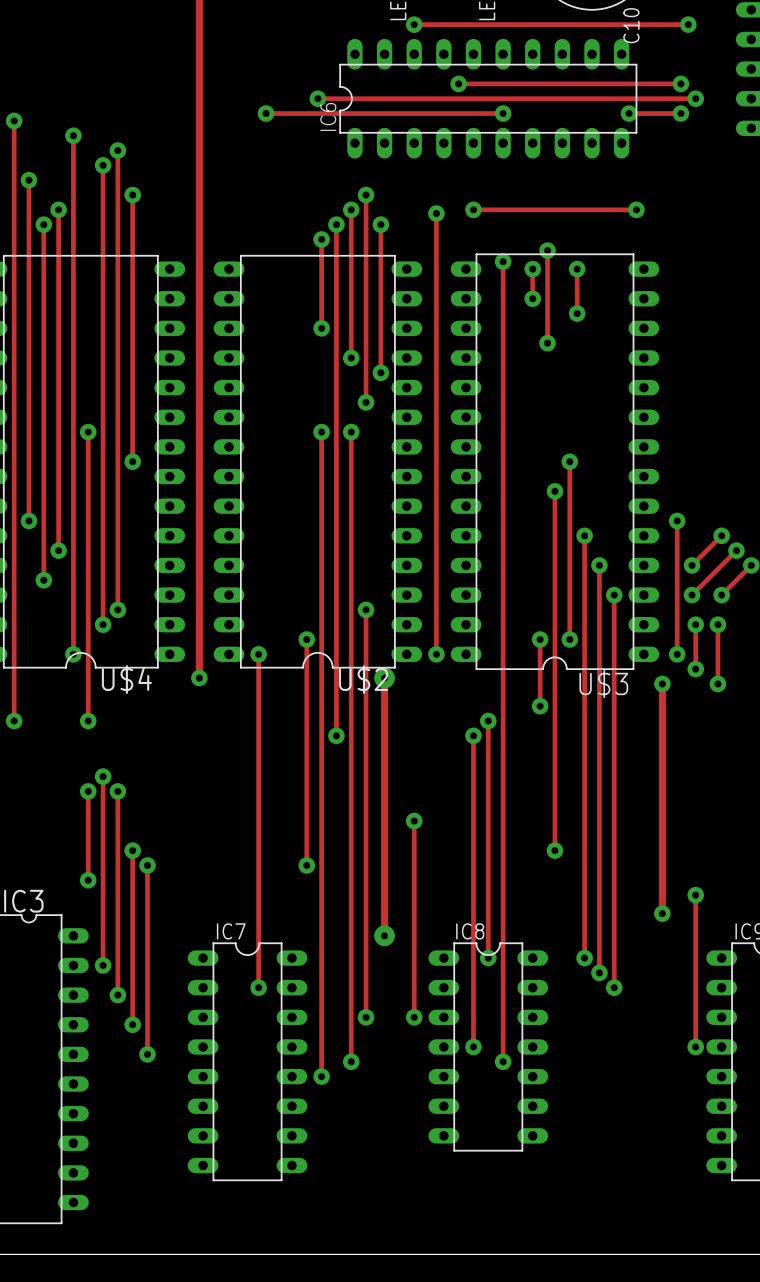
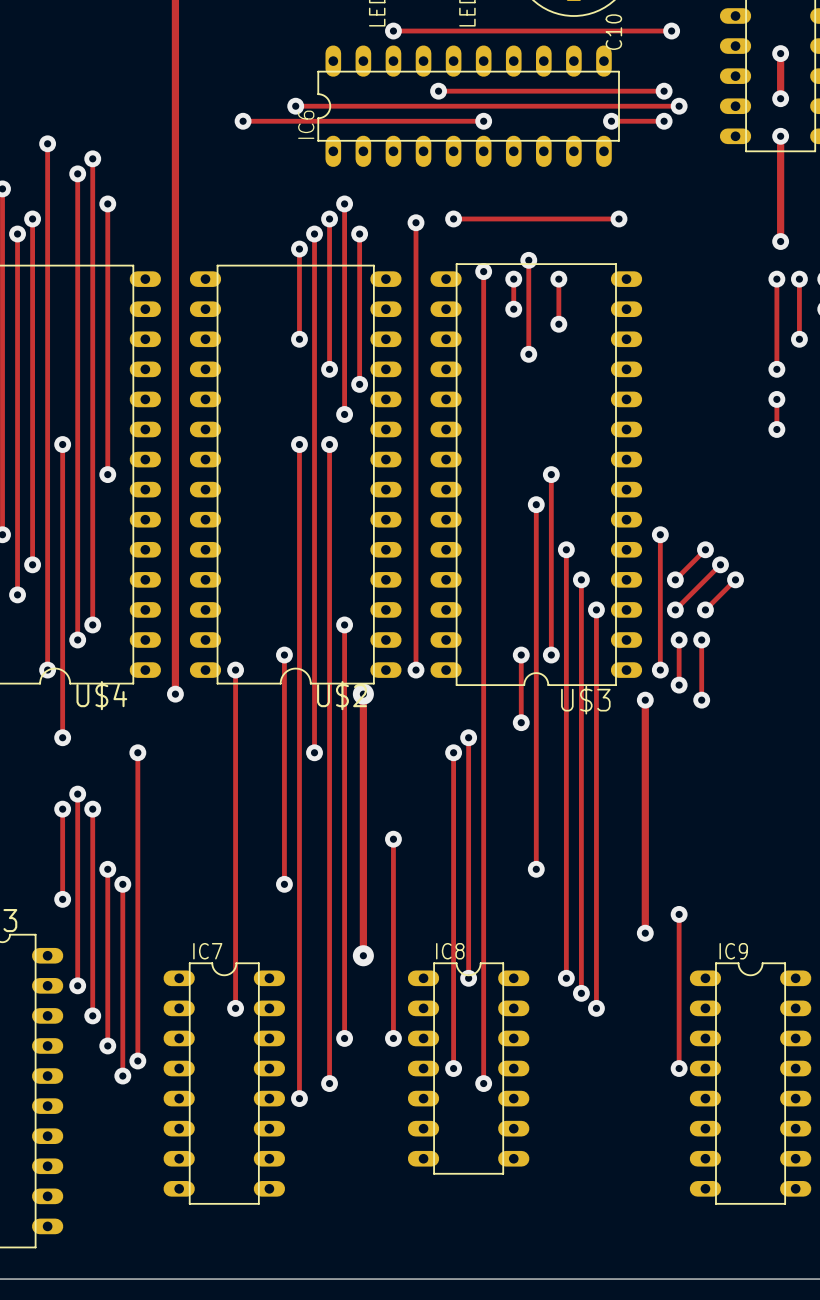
track: none -> (137, 752) (137, 1061)
via: none -> (137, 752)
via: none -> (137, 1061)

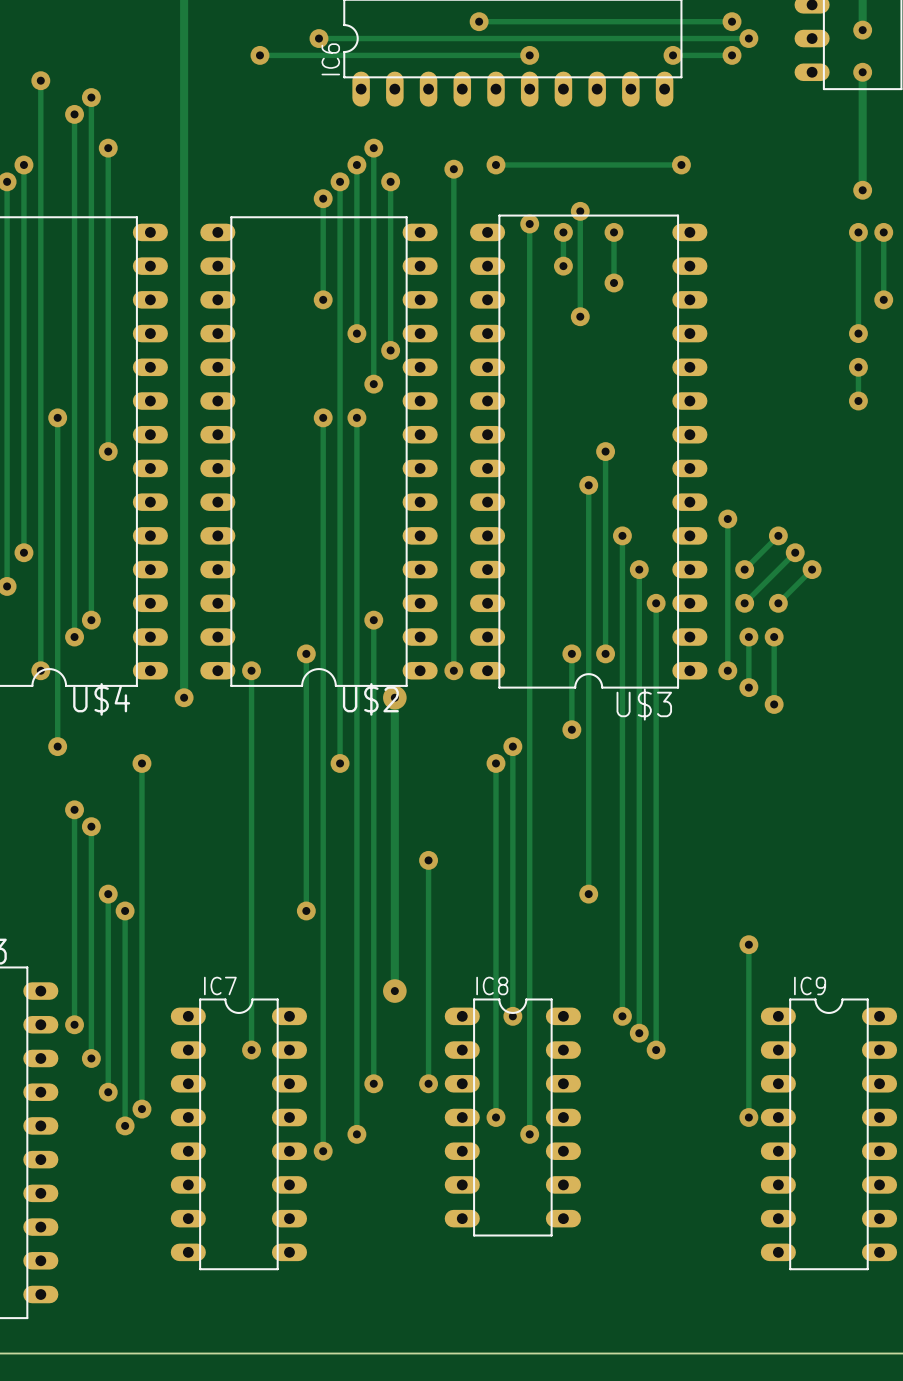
track: (645, 700) (645, 933) -> none
via: (645, 700) -> none
track: (62, 809) (62, 899) -> none
via: (62, 809) -> none
via: (62, 899) -> none
via: (645, 933) -> none

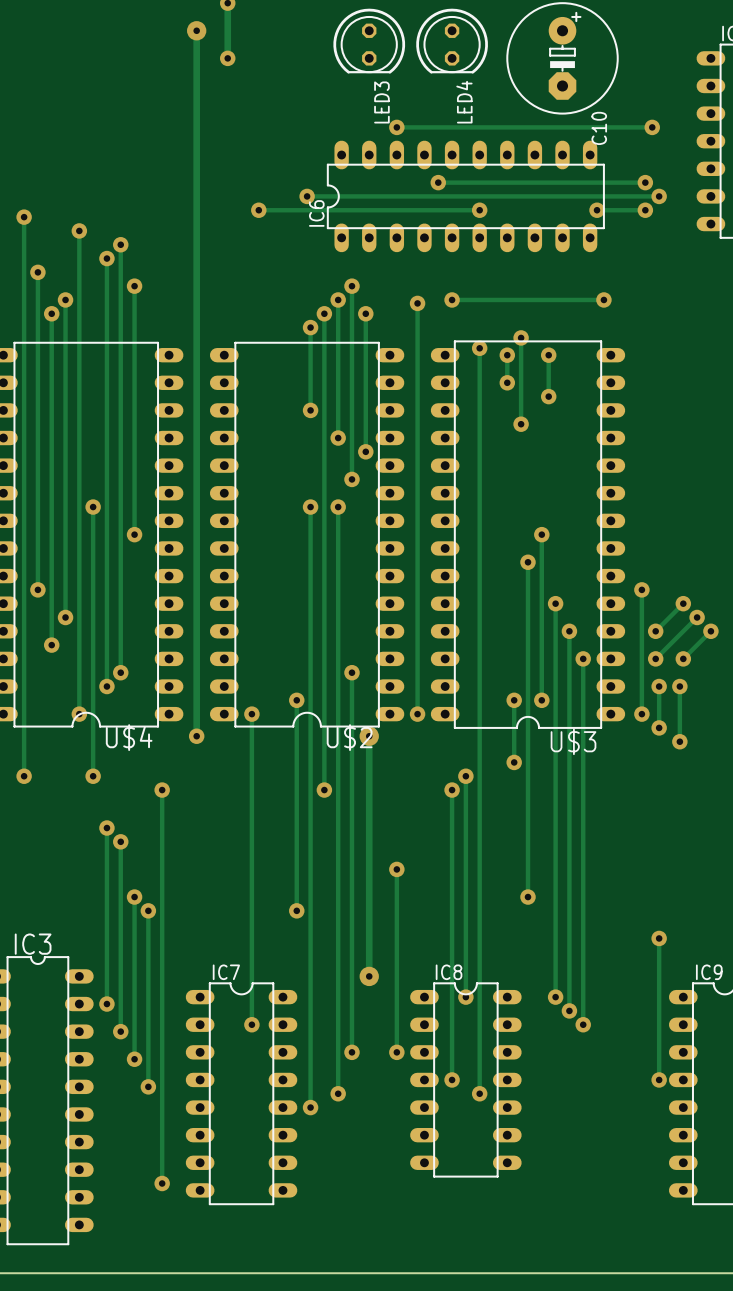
track: none -> (162, 1073) (162, 1183)
via: (141, 1109) -> none
via: none -> (162, 1183)

